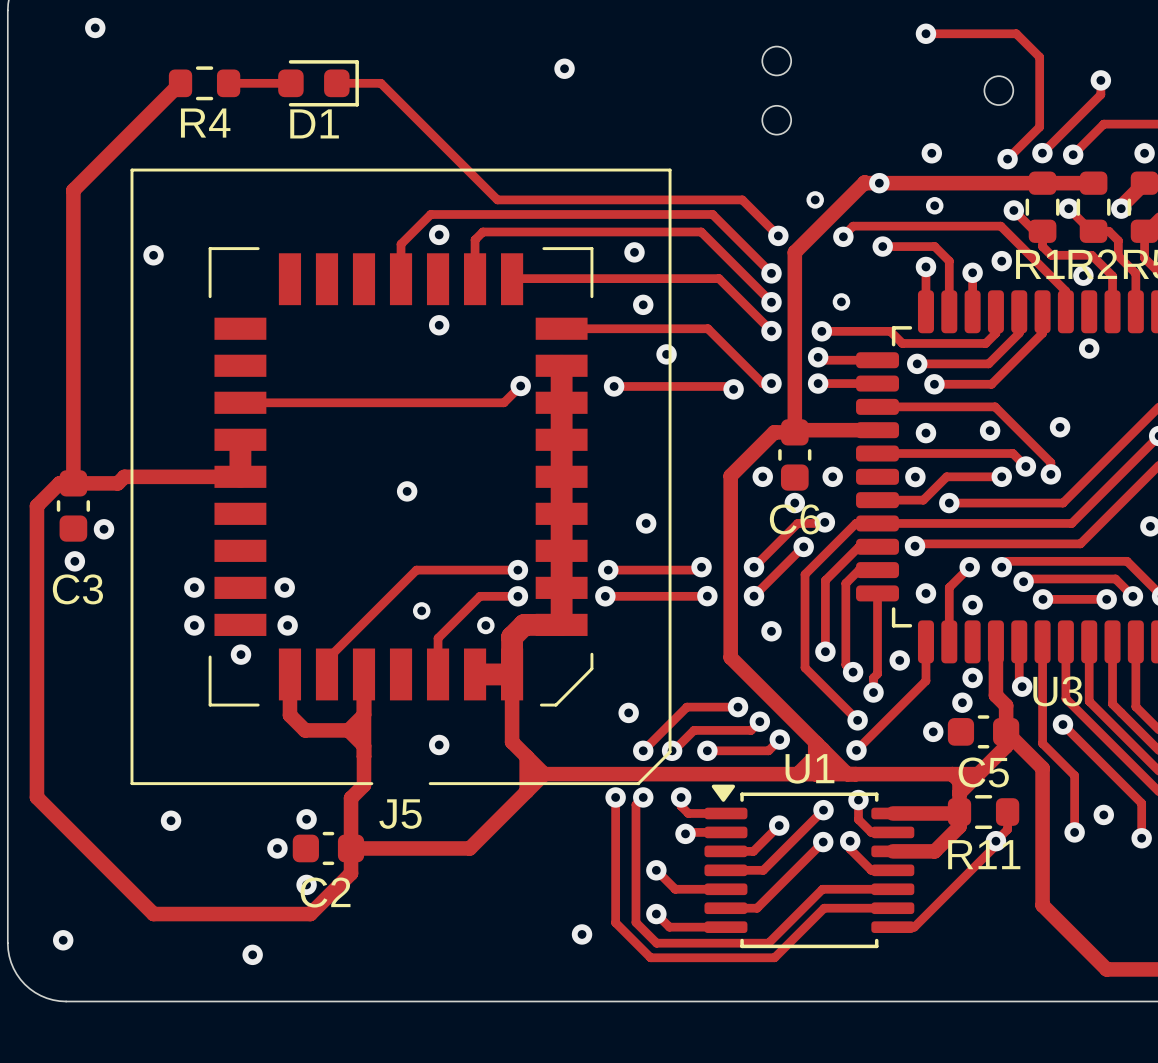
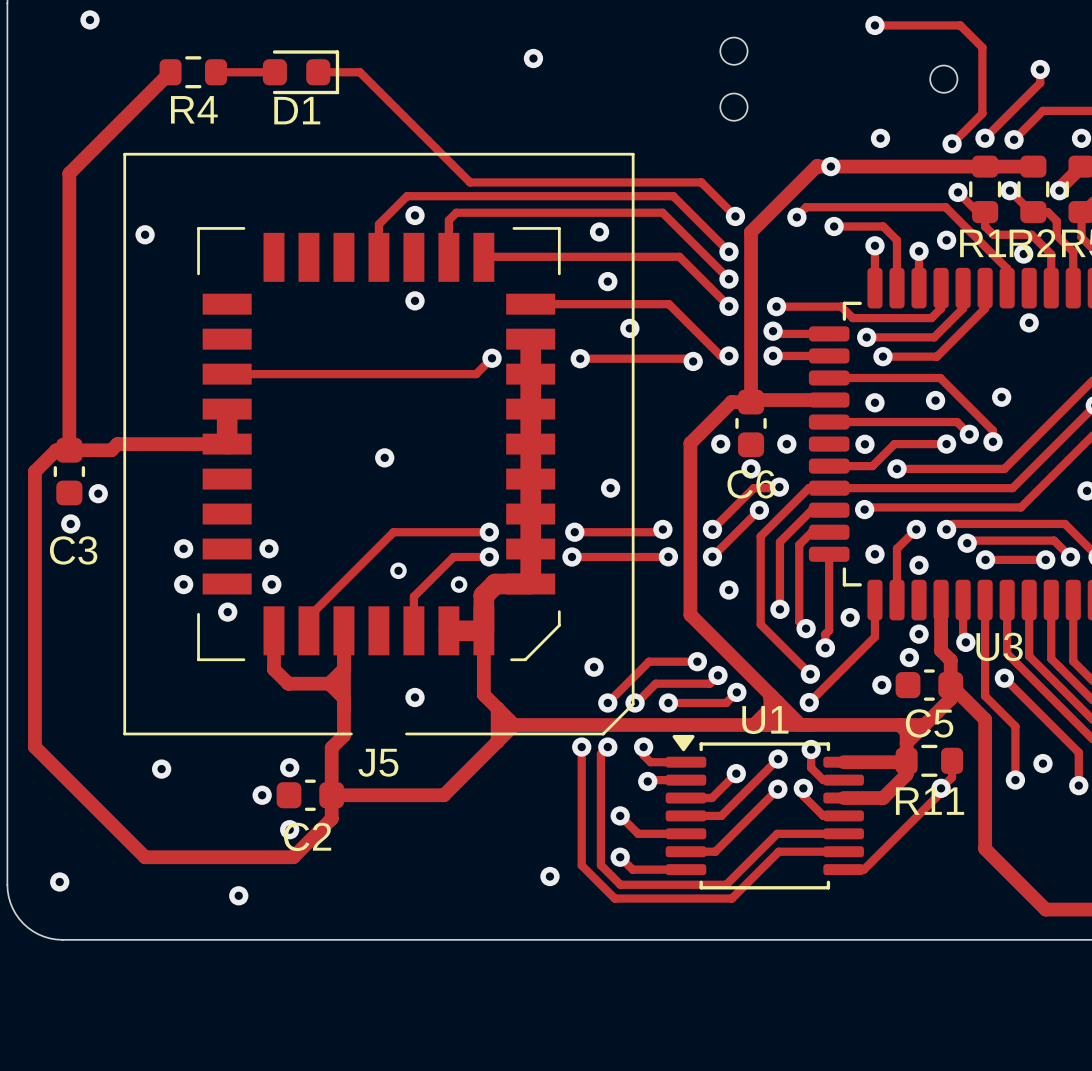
via: (815, 199) -> none
via: (934, 205) -> none
via: (841, 301) -> none

